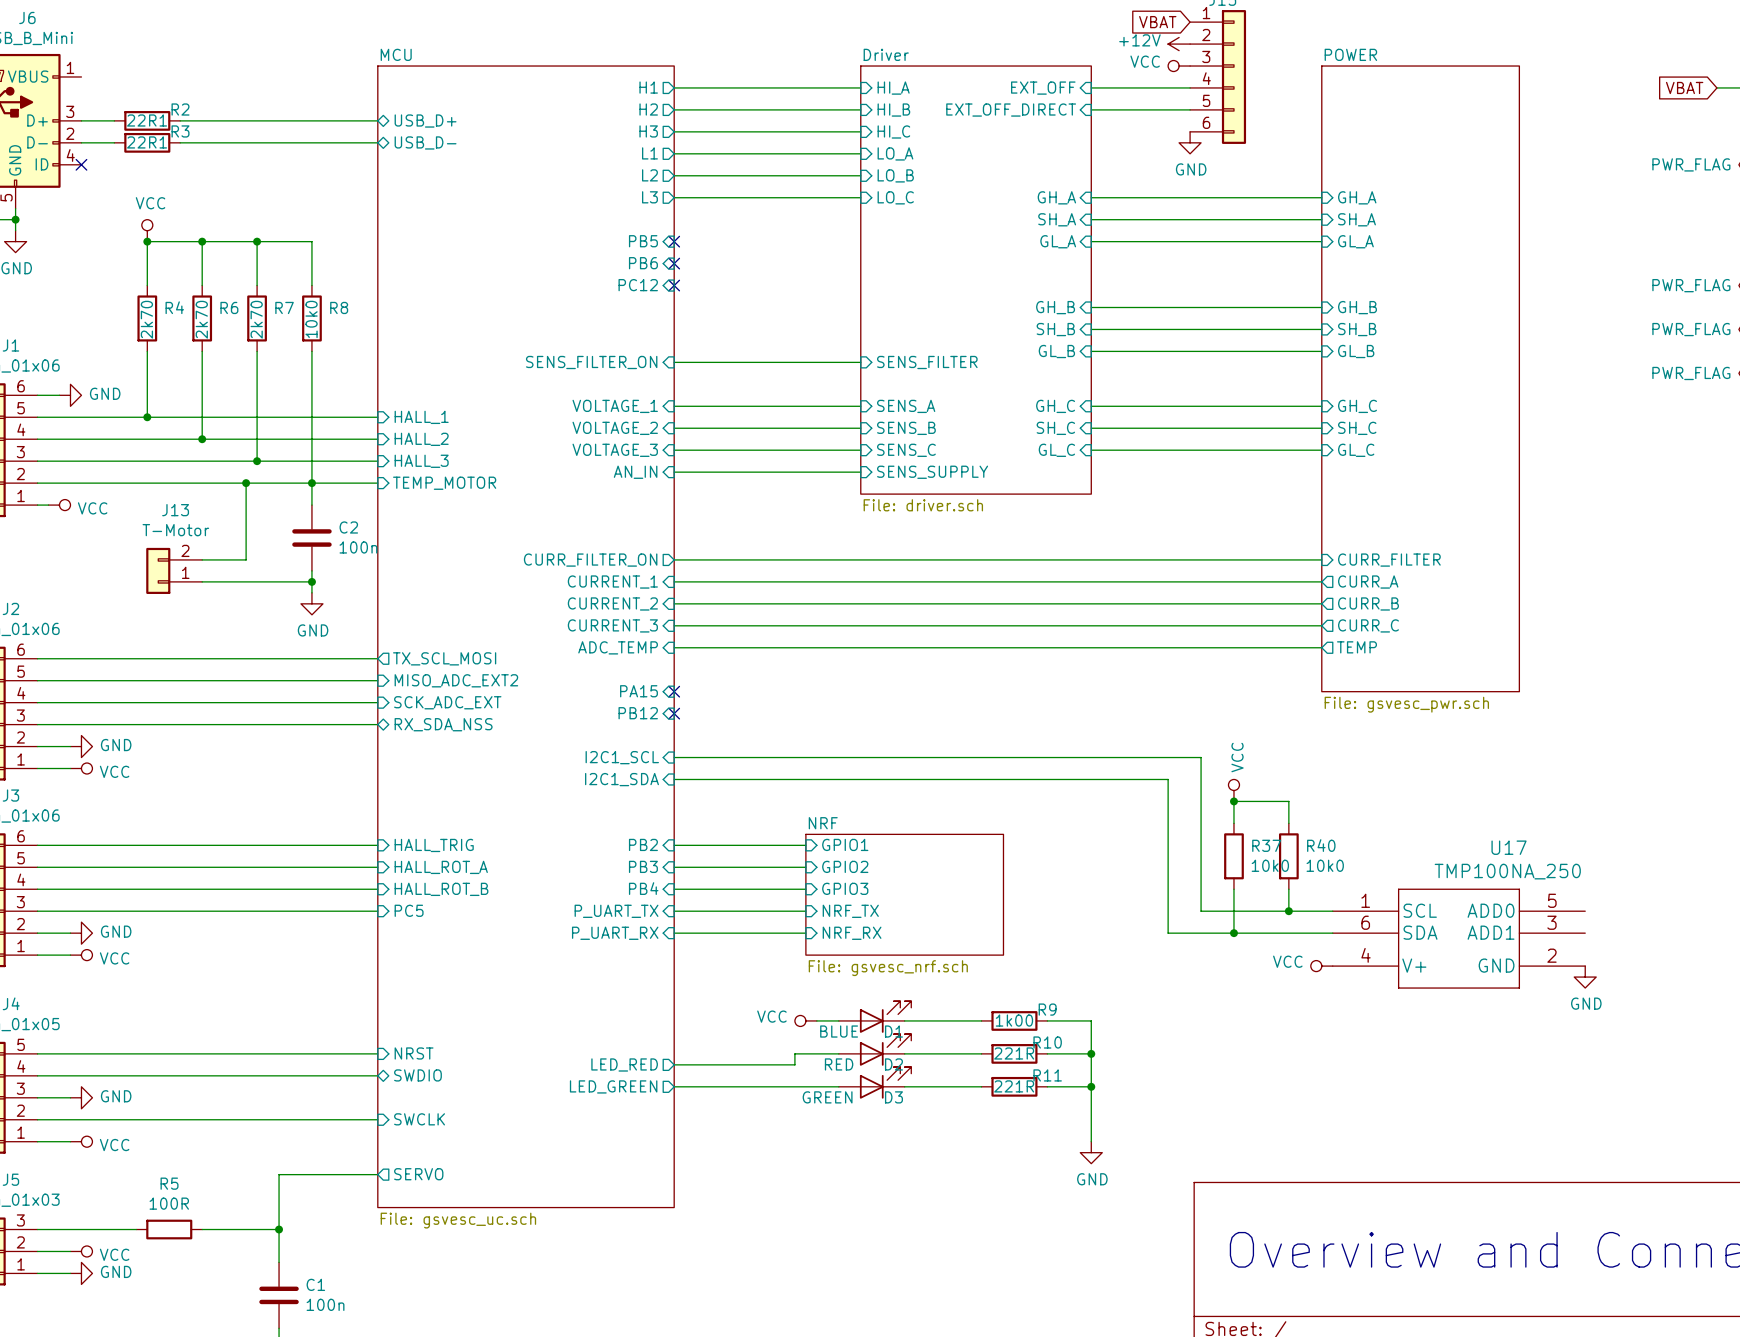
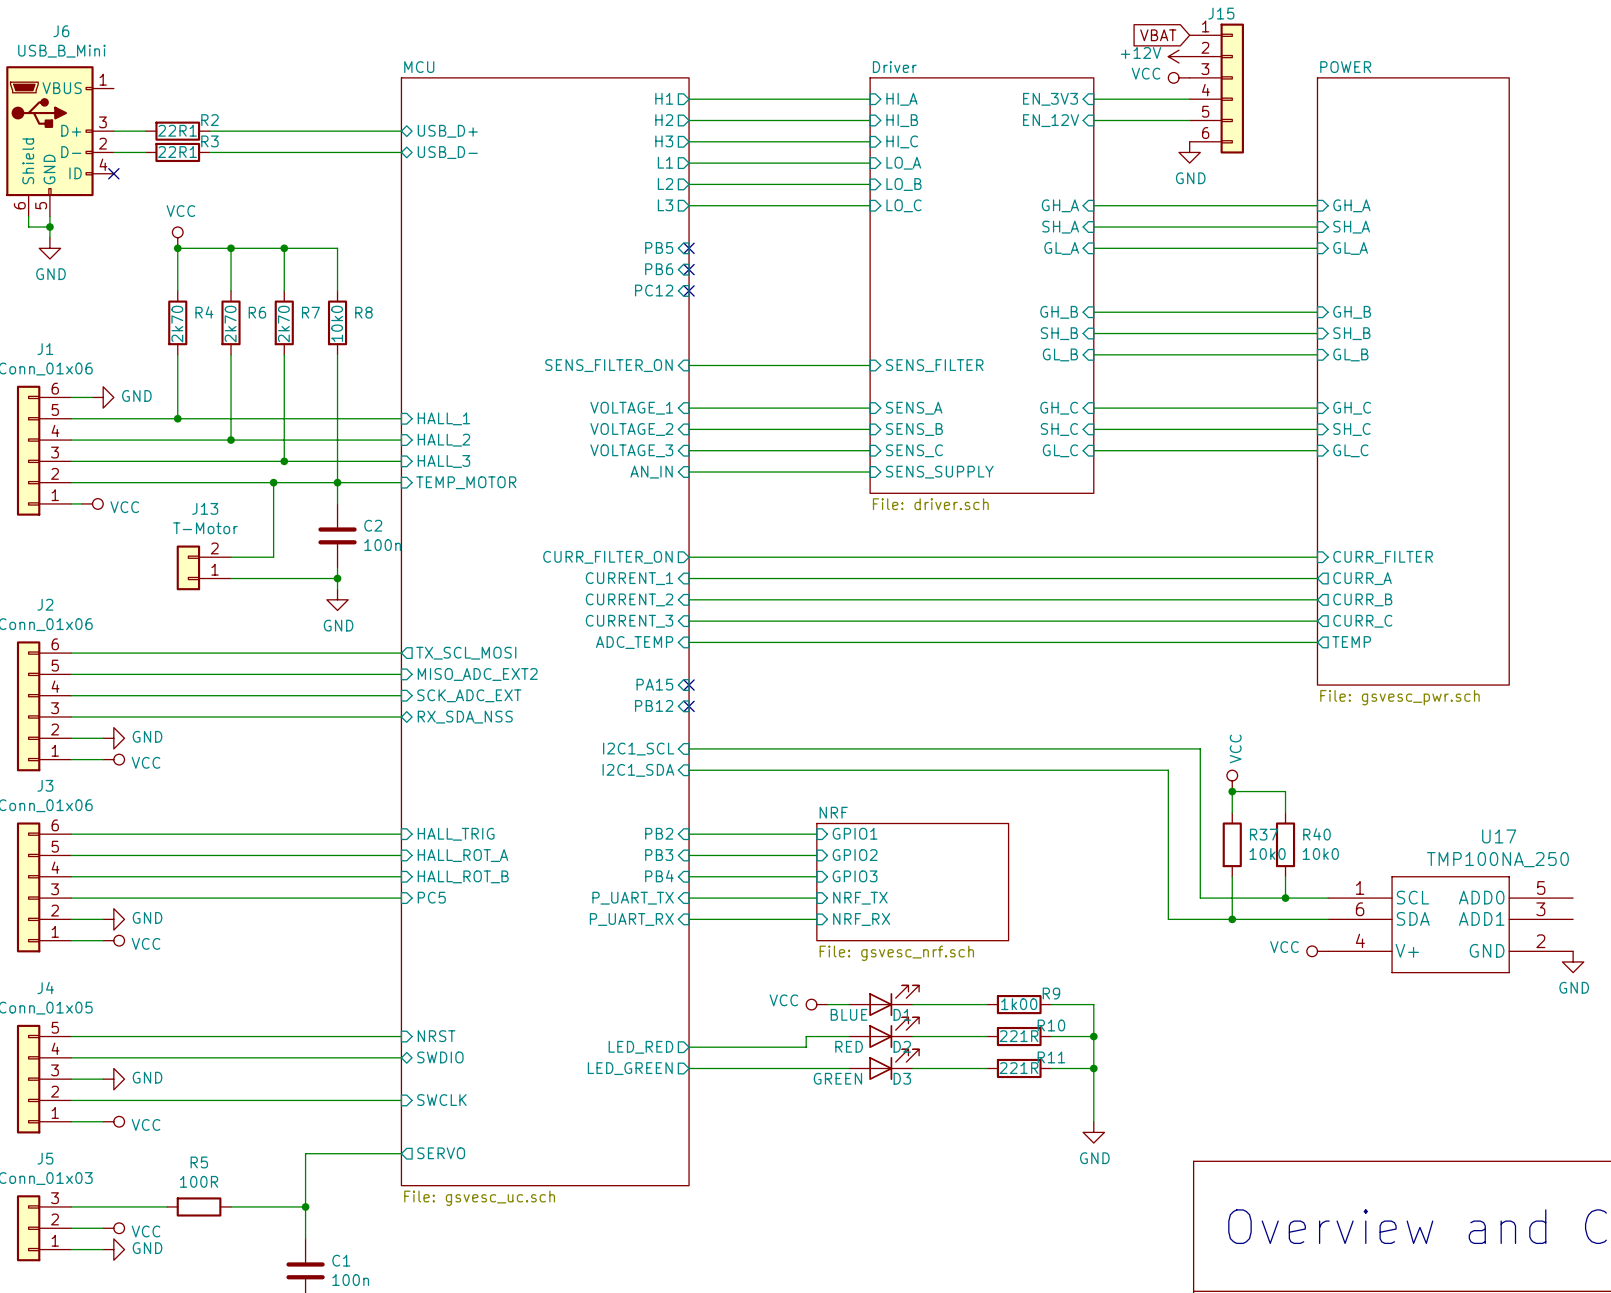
sheet pin: EXT_OFF (1043, 88) -> EN_3V3 (1050, 99)
sheet pin: EXT_OFF_DIRECT (1011, 110) -> EN_12V (1051, 120)

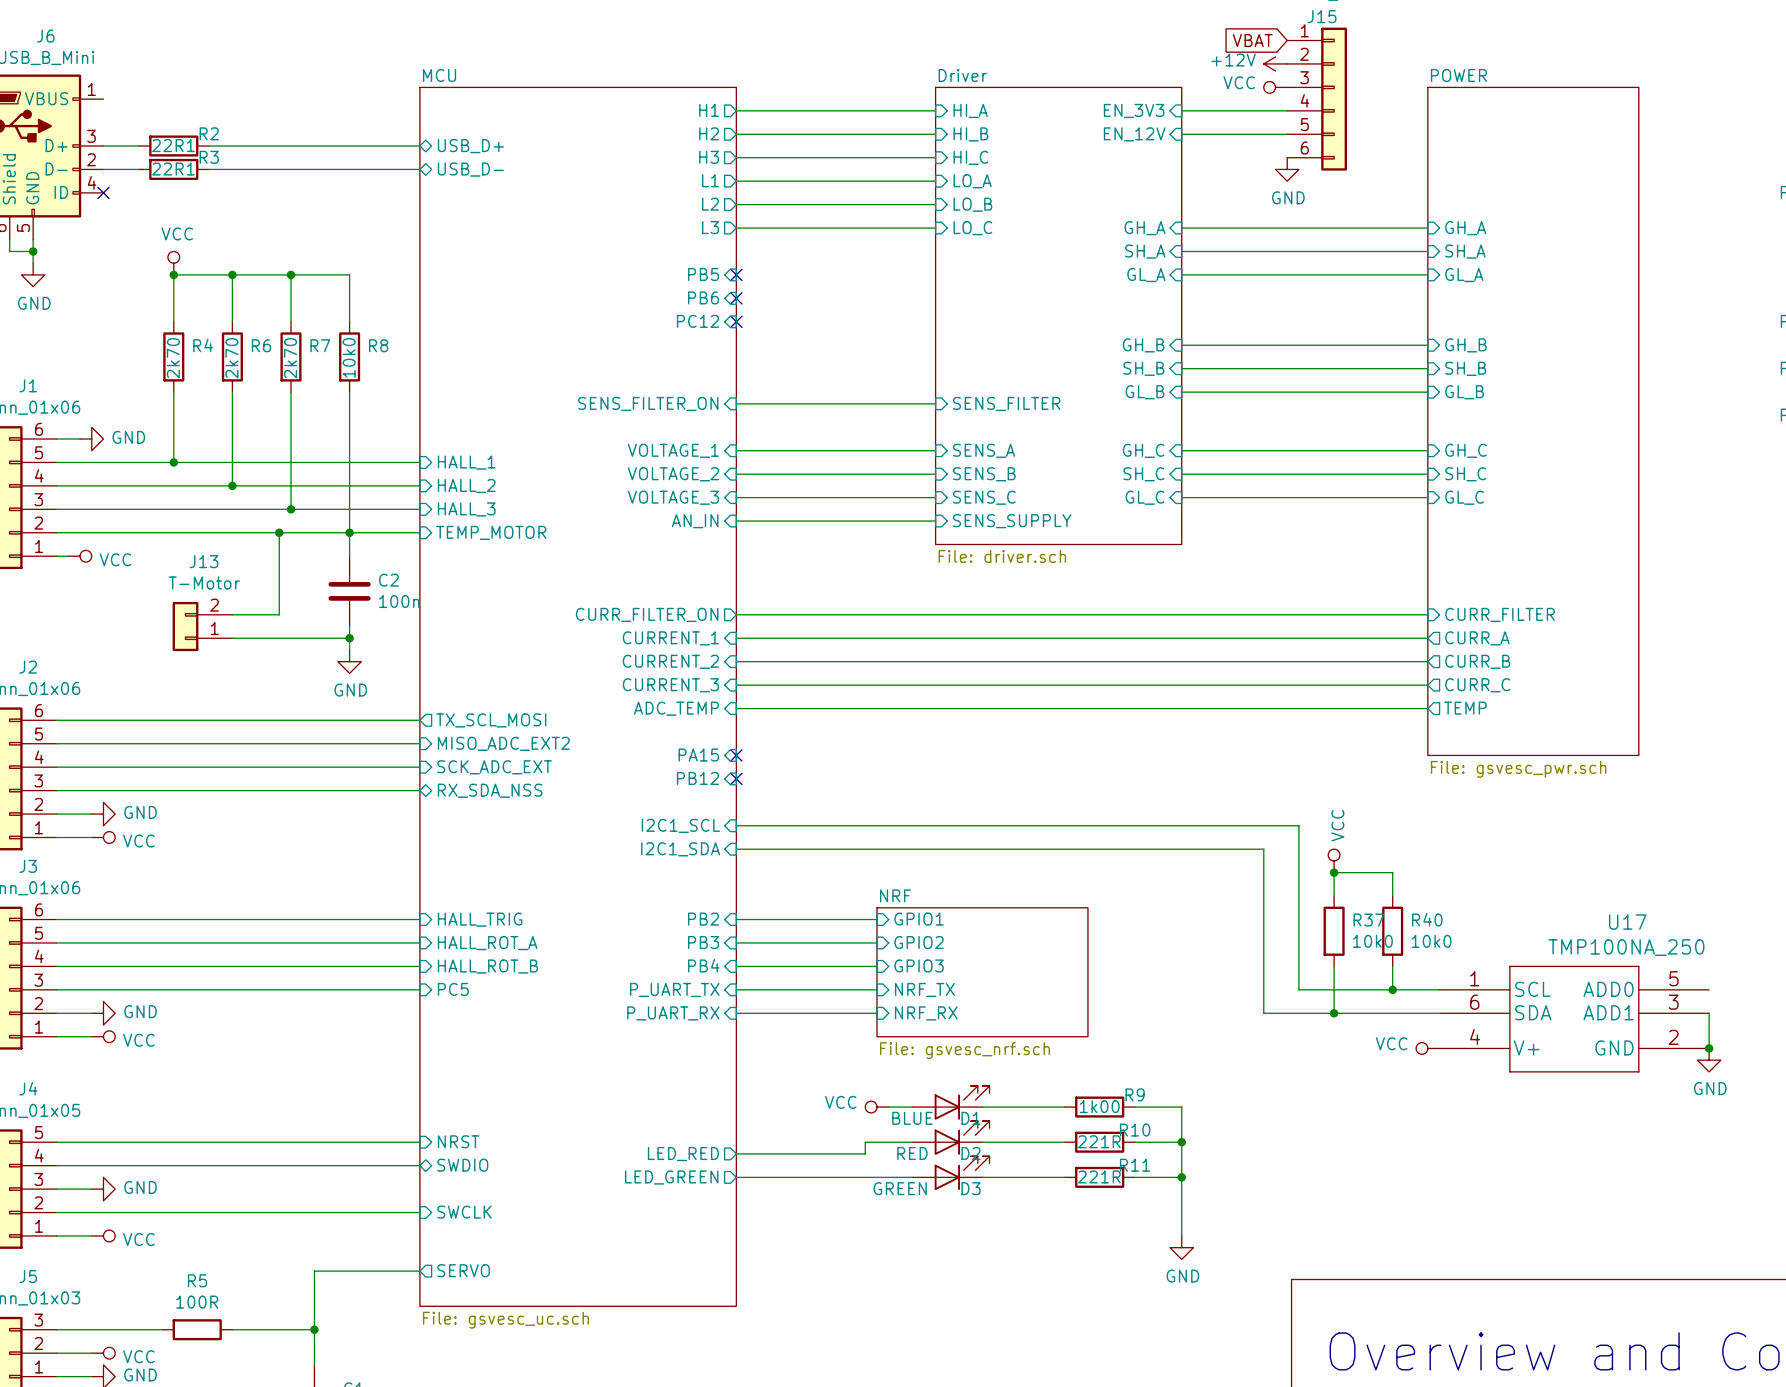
wire: none -> (1709, 1013) (1709, 1048)
junction: none -> (1709, 1048)

